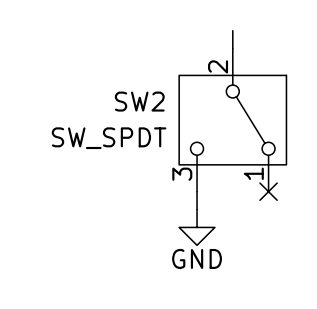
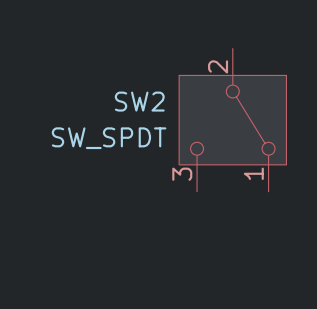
wire: (232, 30) (232, 48) -> none
wire: (197, 191) (197, 209) -> none
no-connect mark: (268, 191) -> none
power symbol: GND (197, 227) -> none

